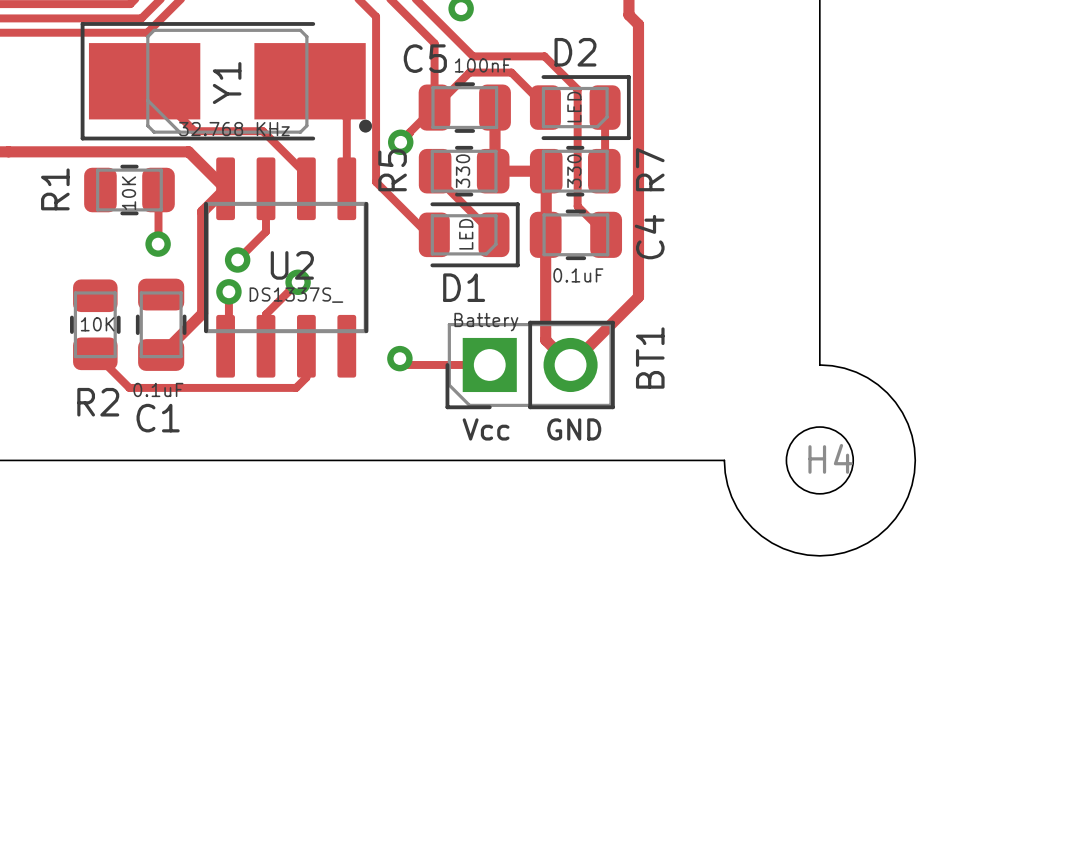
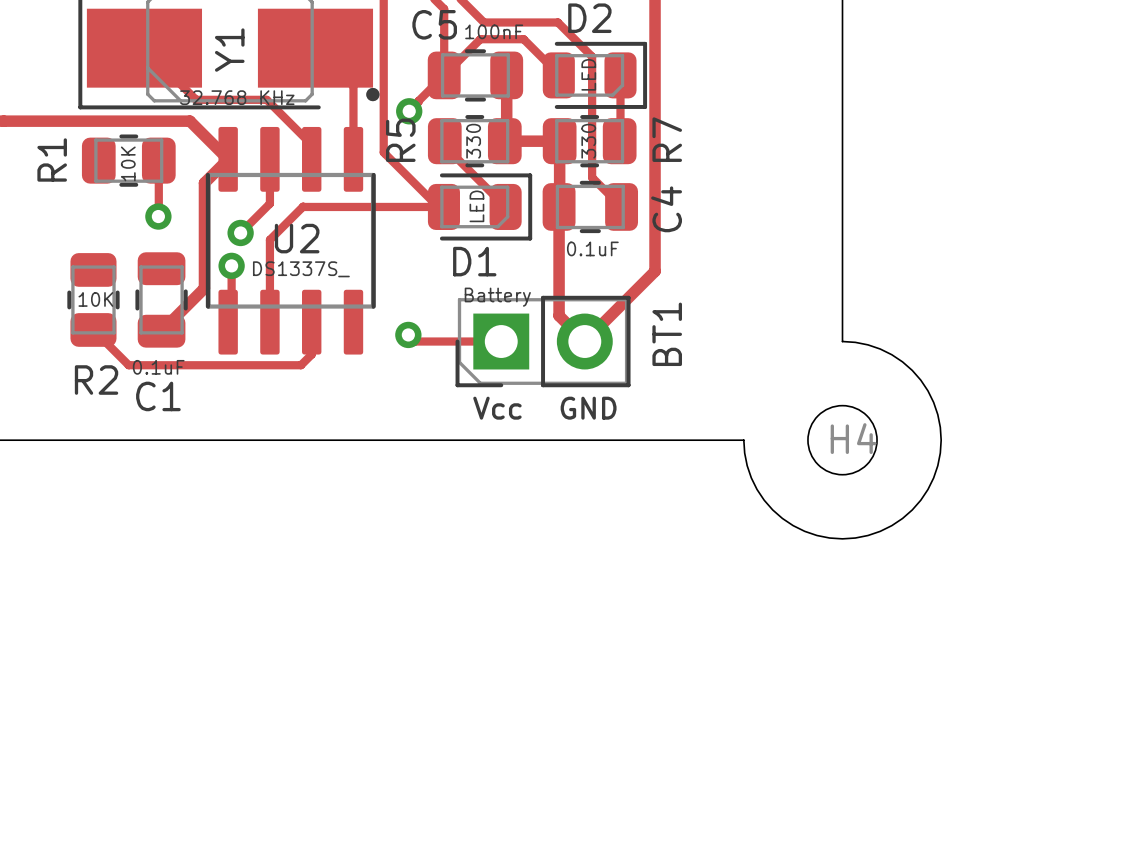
track: none -> (303, 206) (438, 206)
track: (298, 282) (265, 314) -> (303, 206) (269, 239) (269, 289)
via: (298, 282) -> none

